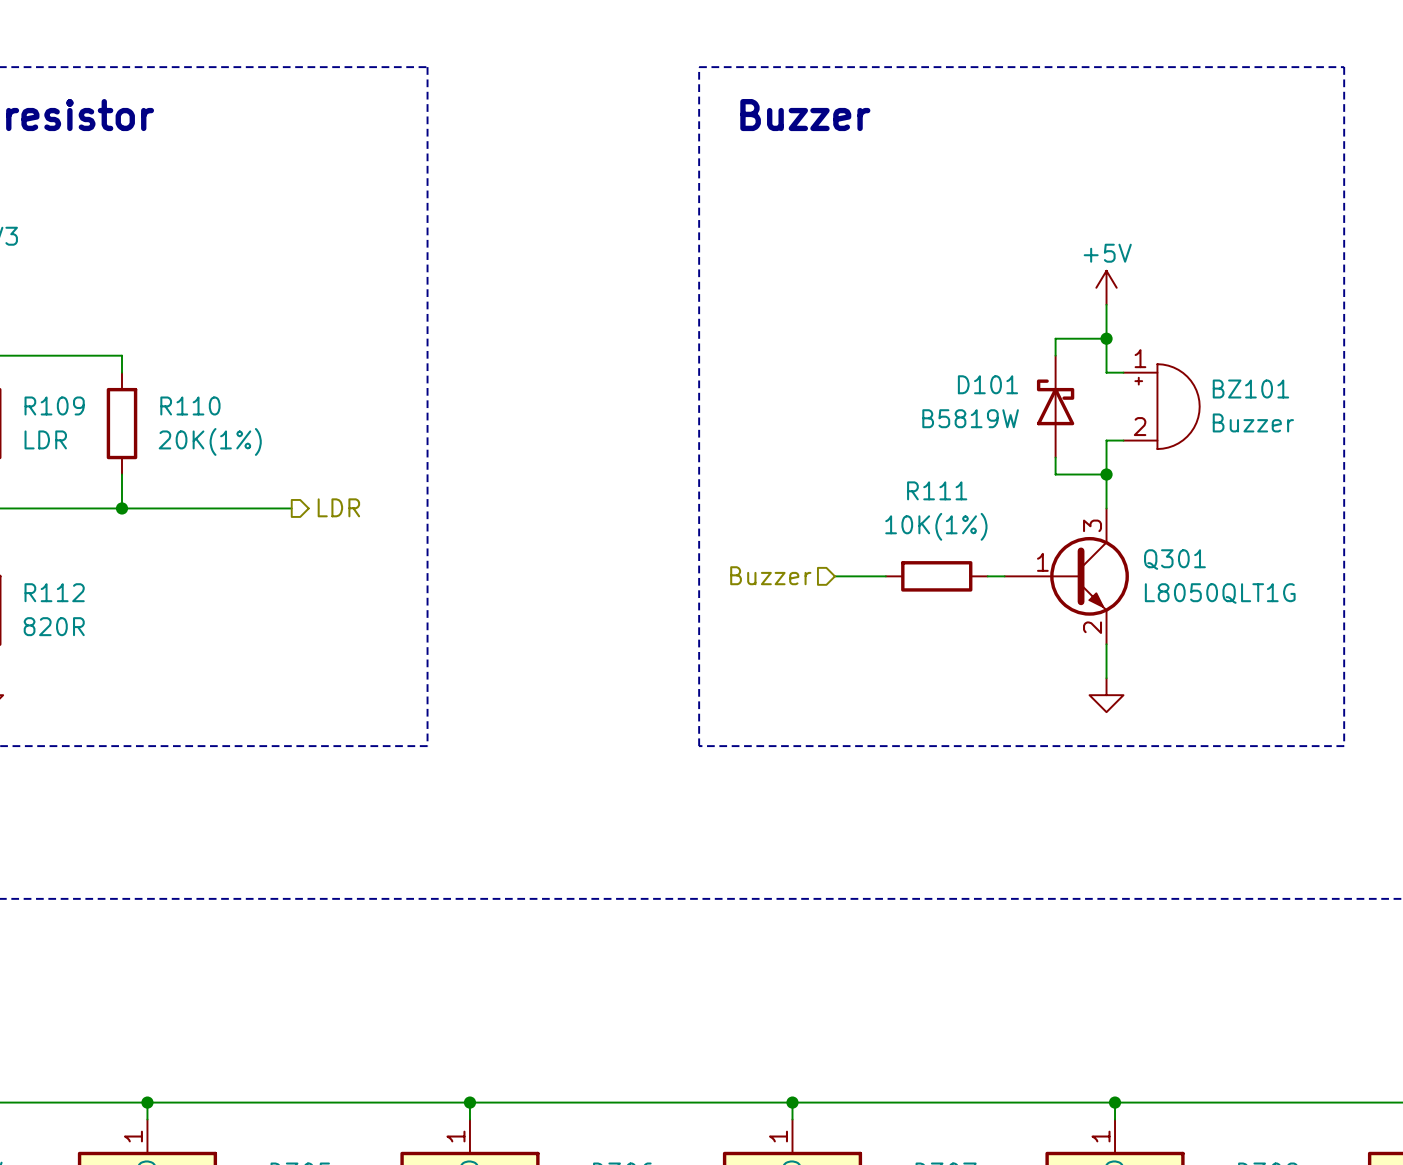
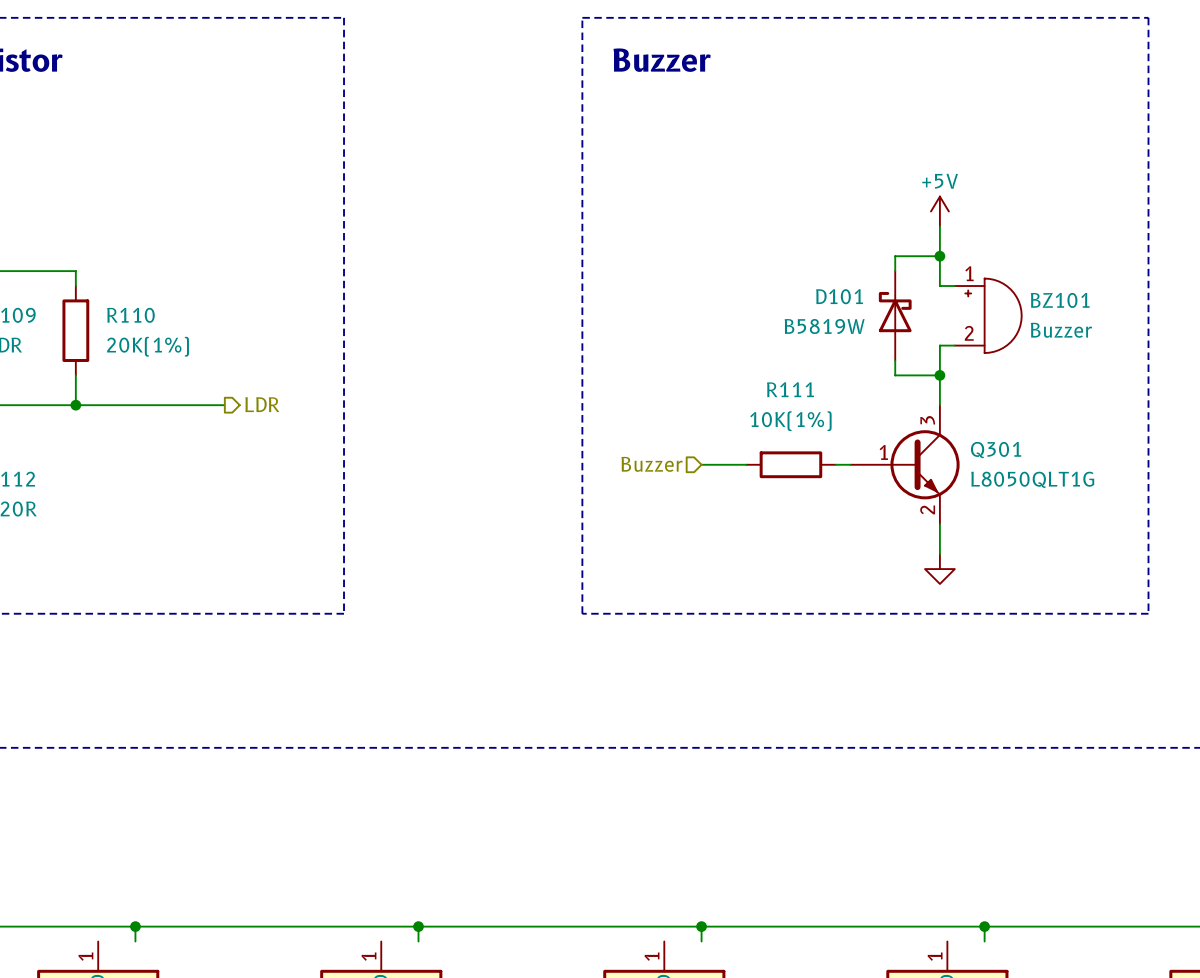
wire: (147, 1102) (147, 1119) -> (135, 926) (135, 941)
junction position: (147, 1102) -> (135, 926)
wire: (469, 1102) (469, 1119) -> (418, 926) (418, 941)
junction position: (469, 1102) -> (418, 926)
wire: (792, 1102) (792, 1119) -> (701, 926) (701, 941)
junction position: (792, 1102) -> (701, 926)
wire: (1115, 1102) (1115, 1119) -> (984, 926) (984, 941)
junction position: (1115, 1102) -> (984, 926)

